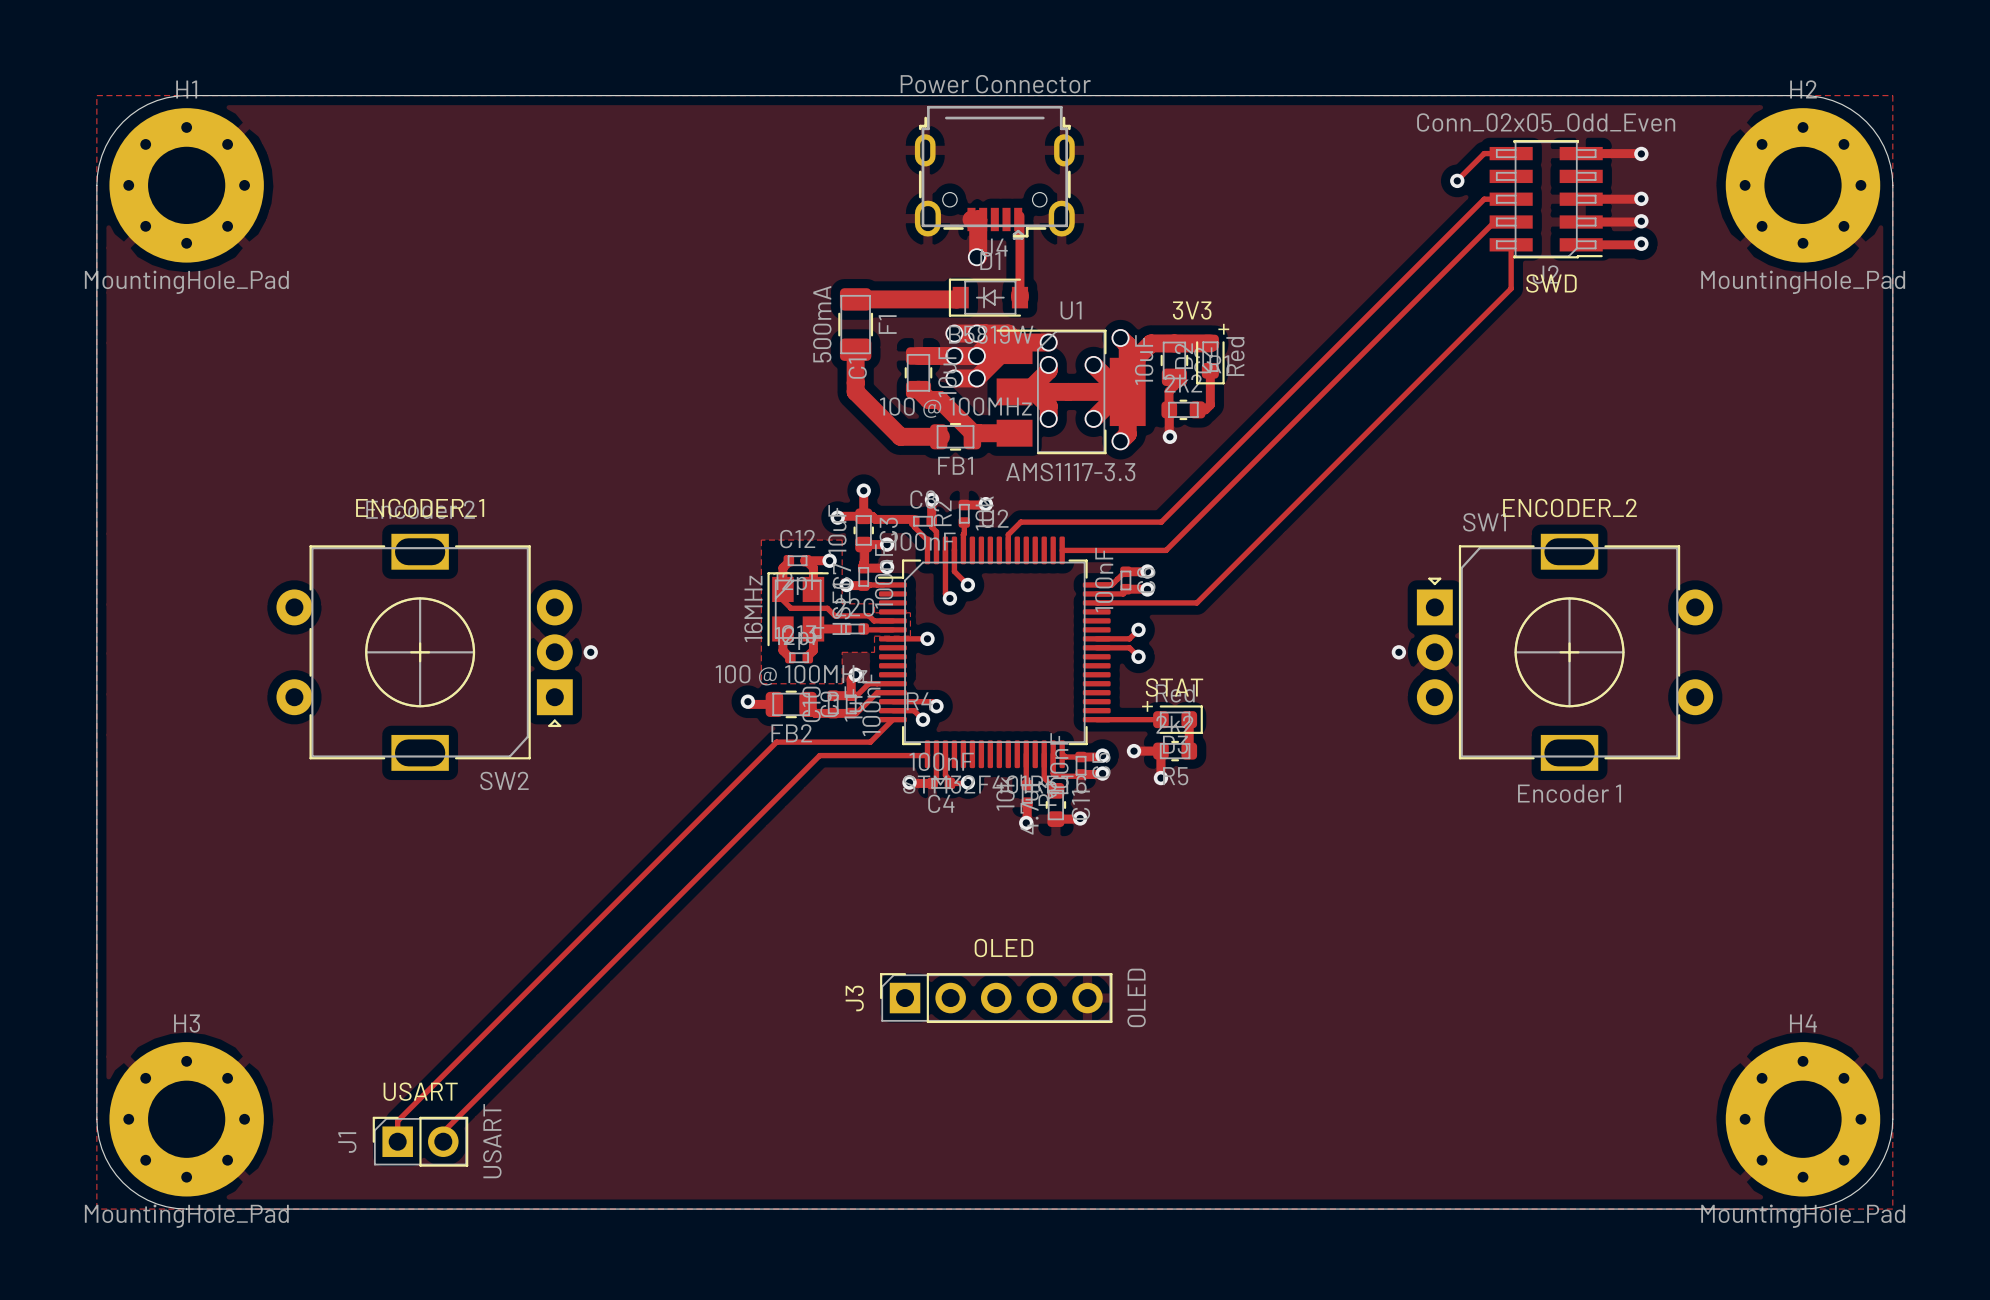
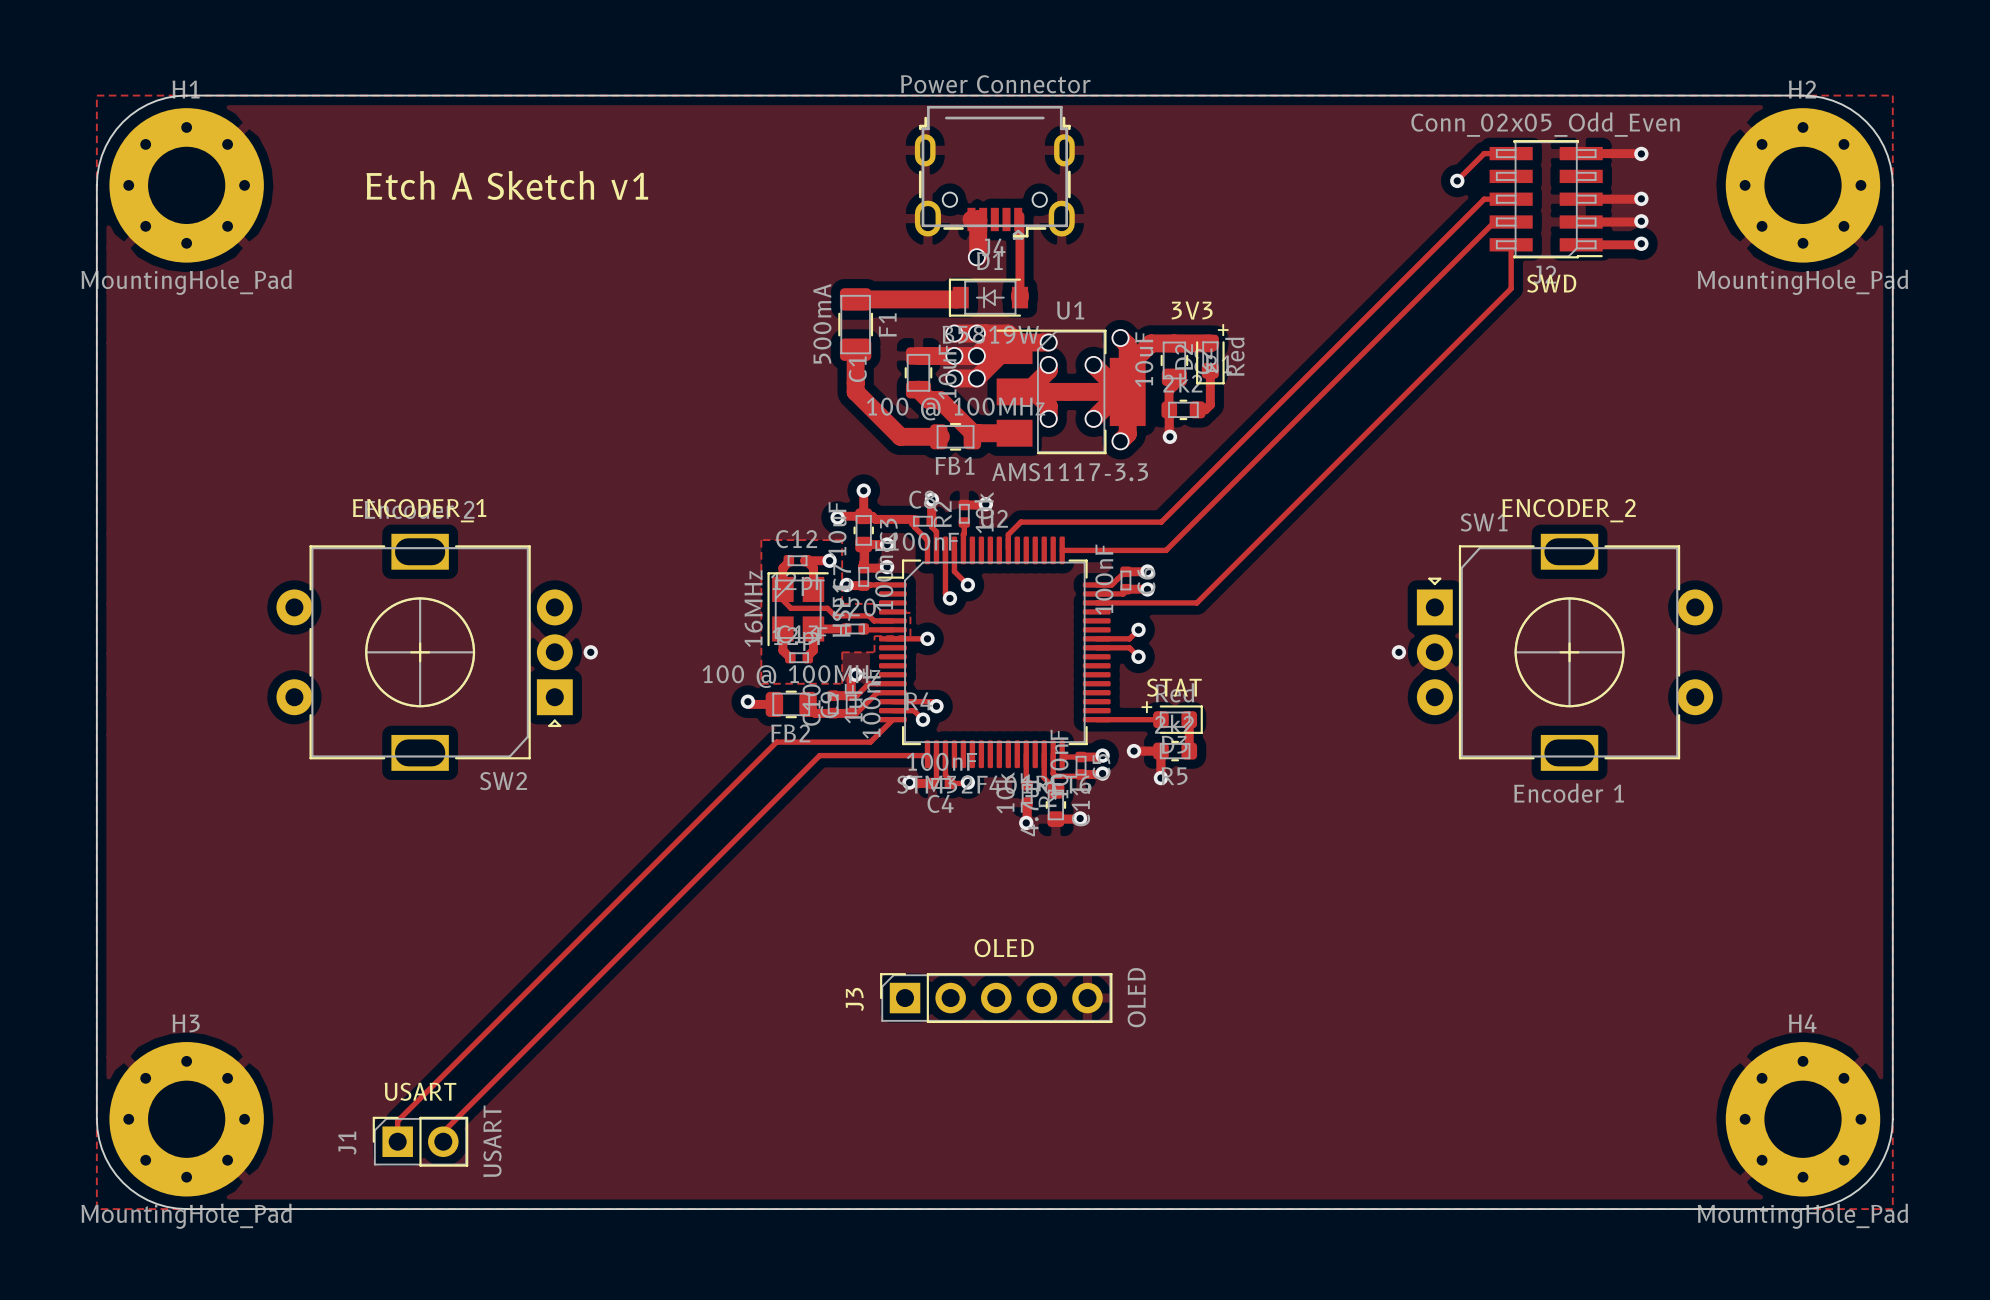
text: none -> Etch A Sketch v1 (507, 185)

